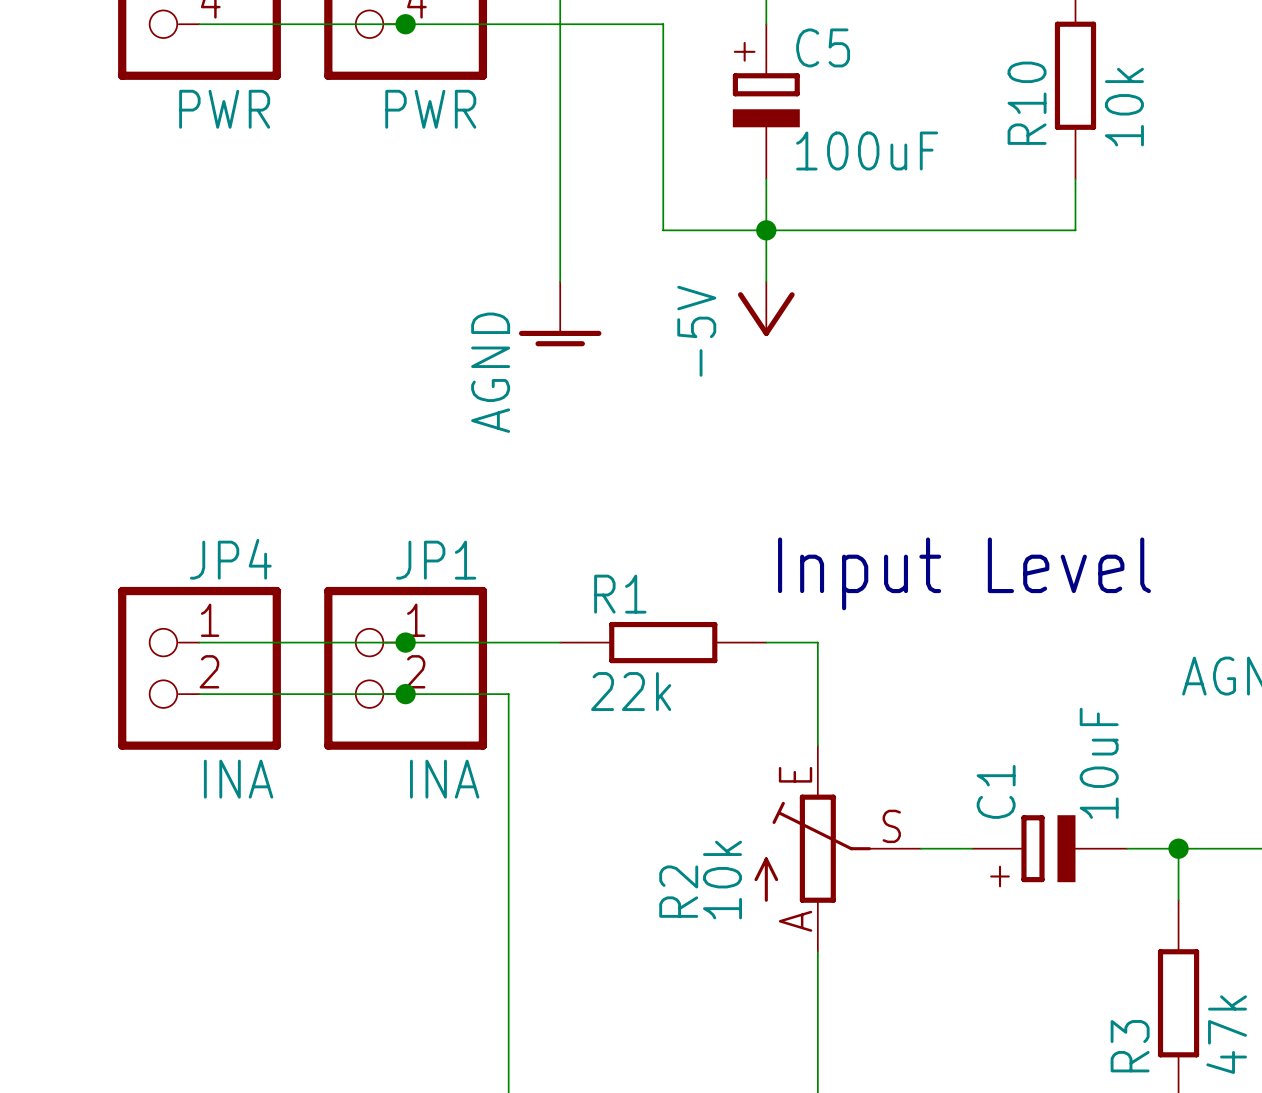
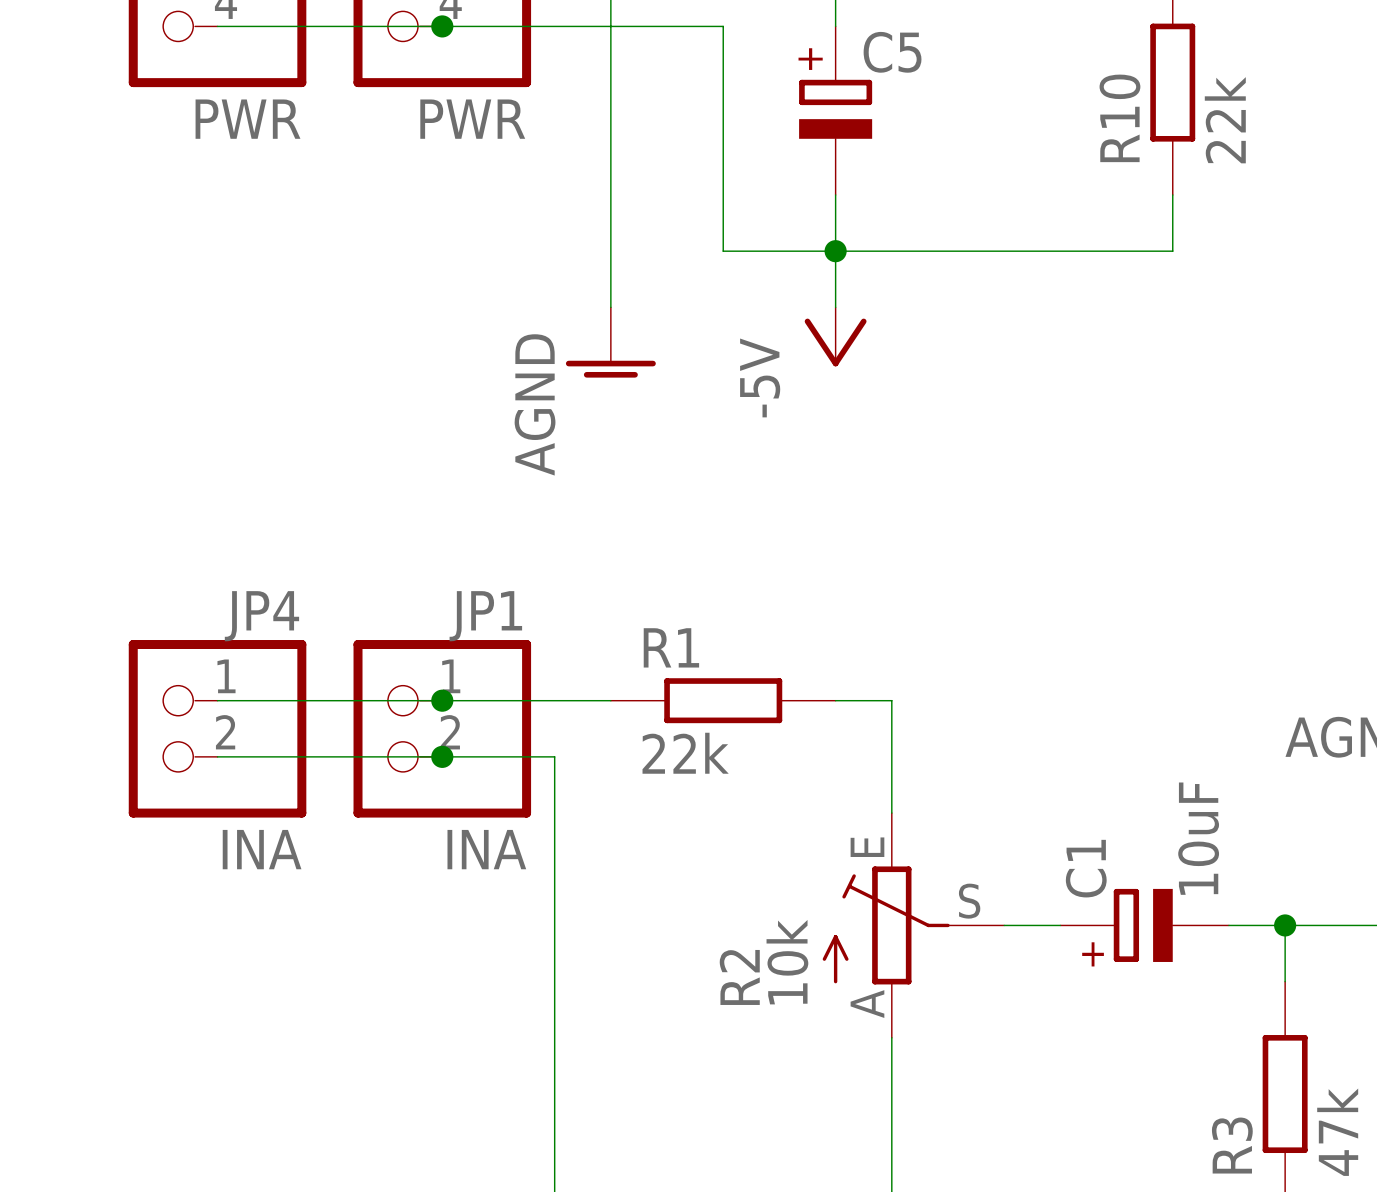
R10 value: 10k (1124, 107) -> 22k (1225, 120)
C5 value: 100uF (867, 150) -> none
text: Input Level (964, 573) -> none

